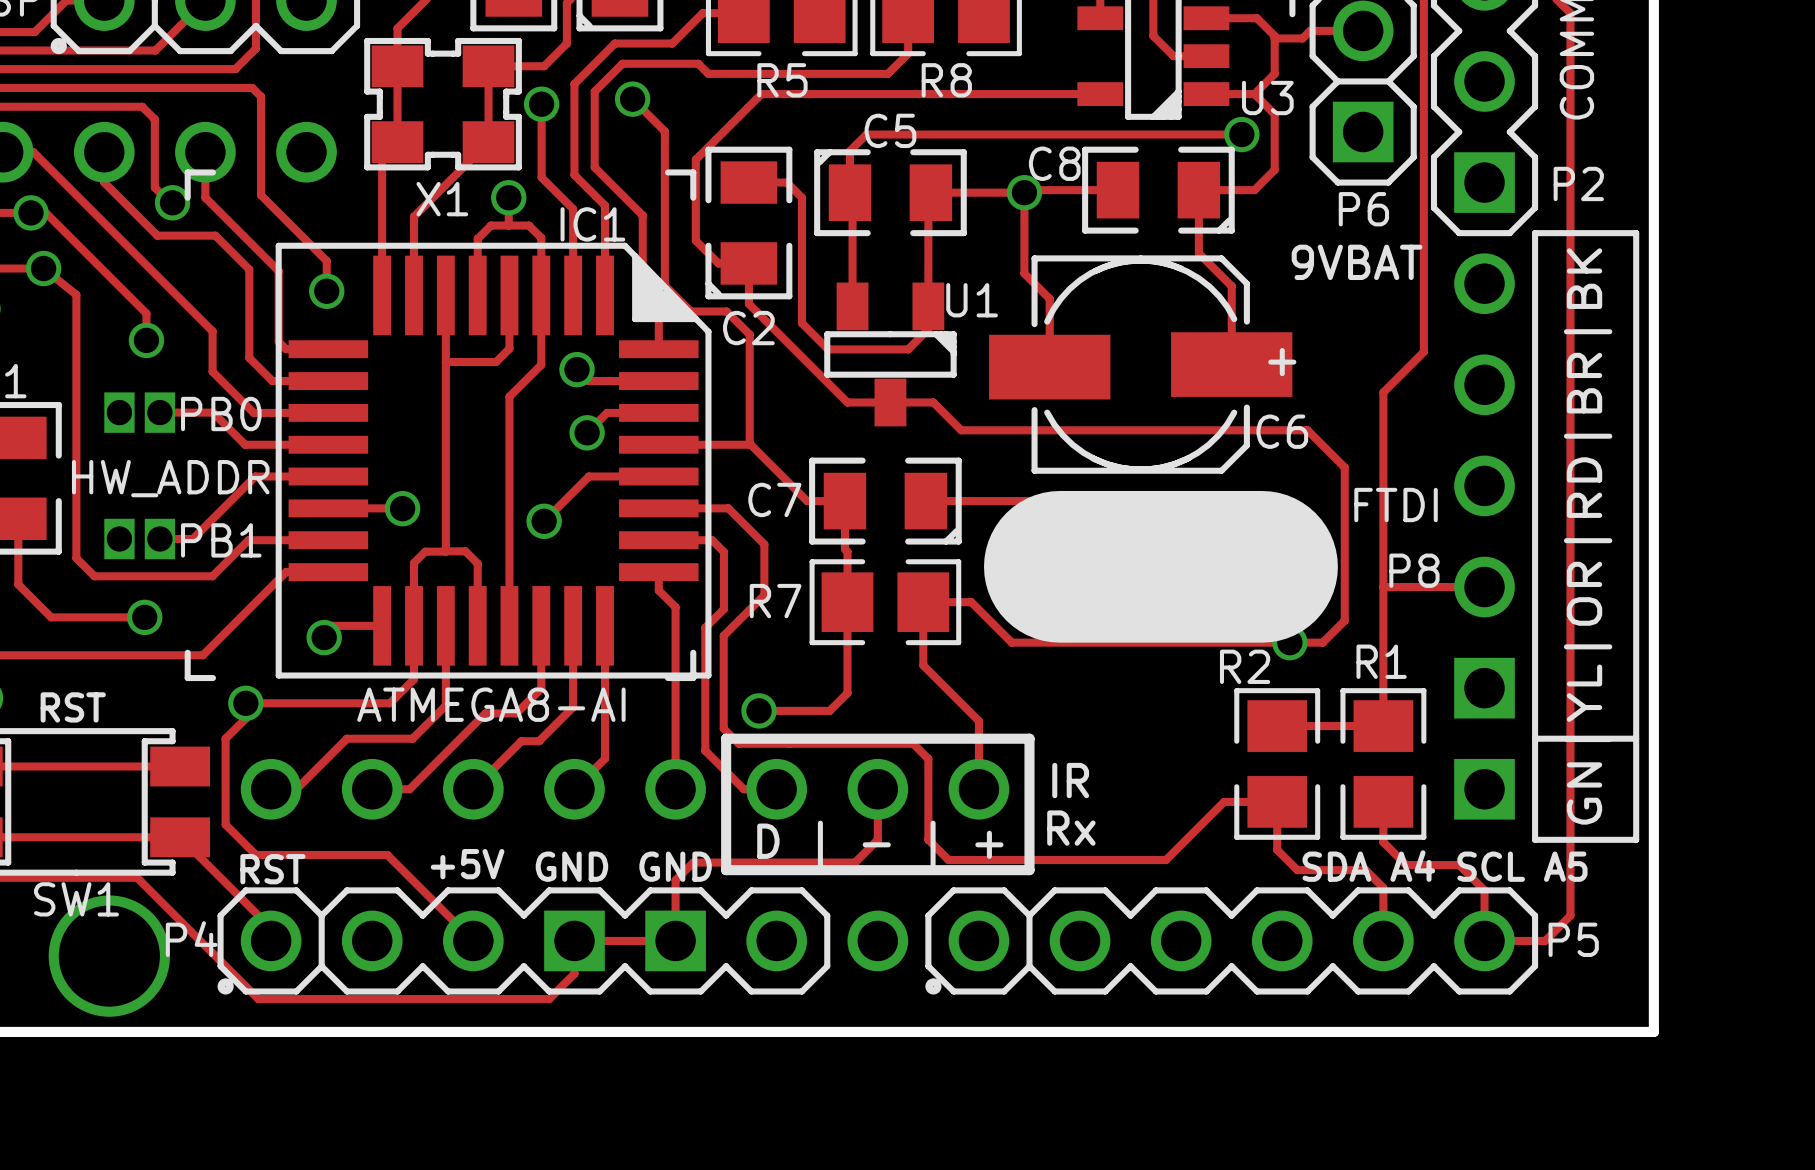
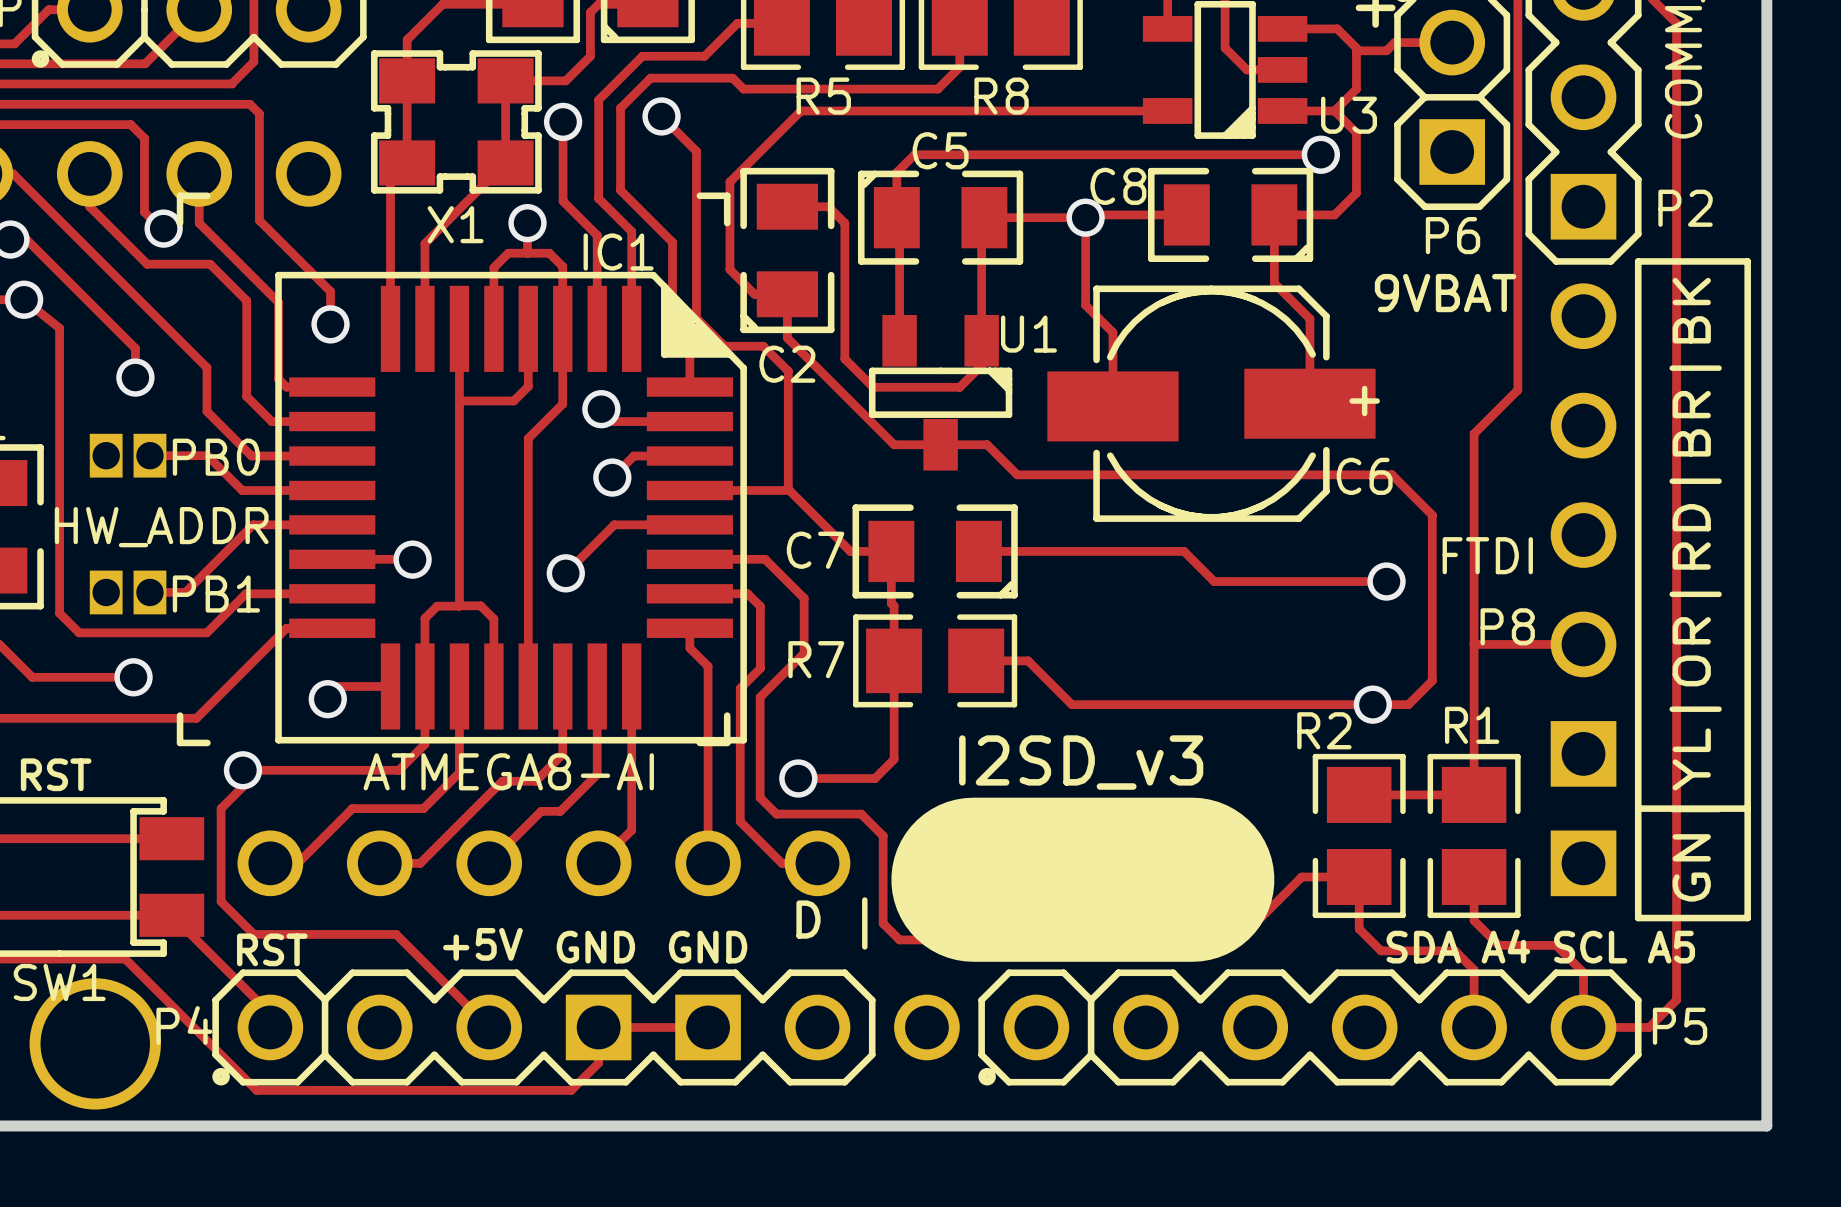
line: (1059, 566) (1262, 566) -> (973, 879) (1192, 879)
track: (923, 602) (923, 665) (978, 721) (978, 789) -> none
text: none -> I2SD_v3 (1081, 762)
line: (726, 738) (726, 870) (1029, 870) (1029, 738) (726, 738) -> none
track: (817, 743) (913, 743) (928, 758) (928, 839) (948, 860) -> (861, 814) (883, 835) (883, 923) (899, 939) (1003, 939)
text: IR (1070, 780) -> none
track: (877, 789) (877, 839) (855, 862) (693, 862) (675, 880) (675, 940) -> none
part: (877, 789) -> none
part: (978, 789) -> none
text: Rx (1071, 828) -> none

